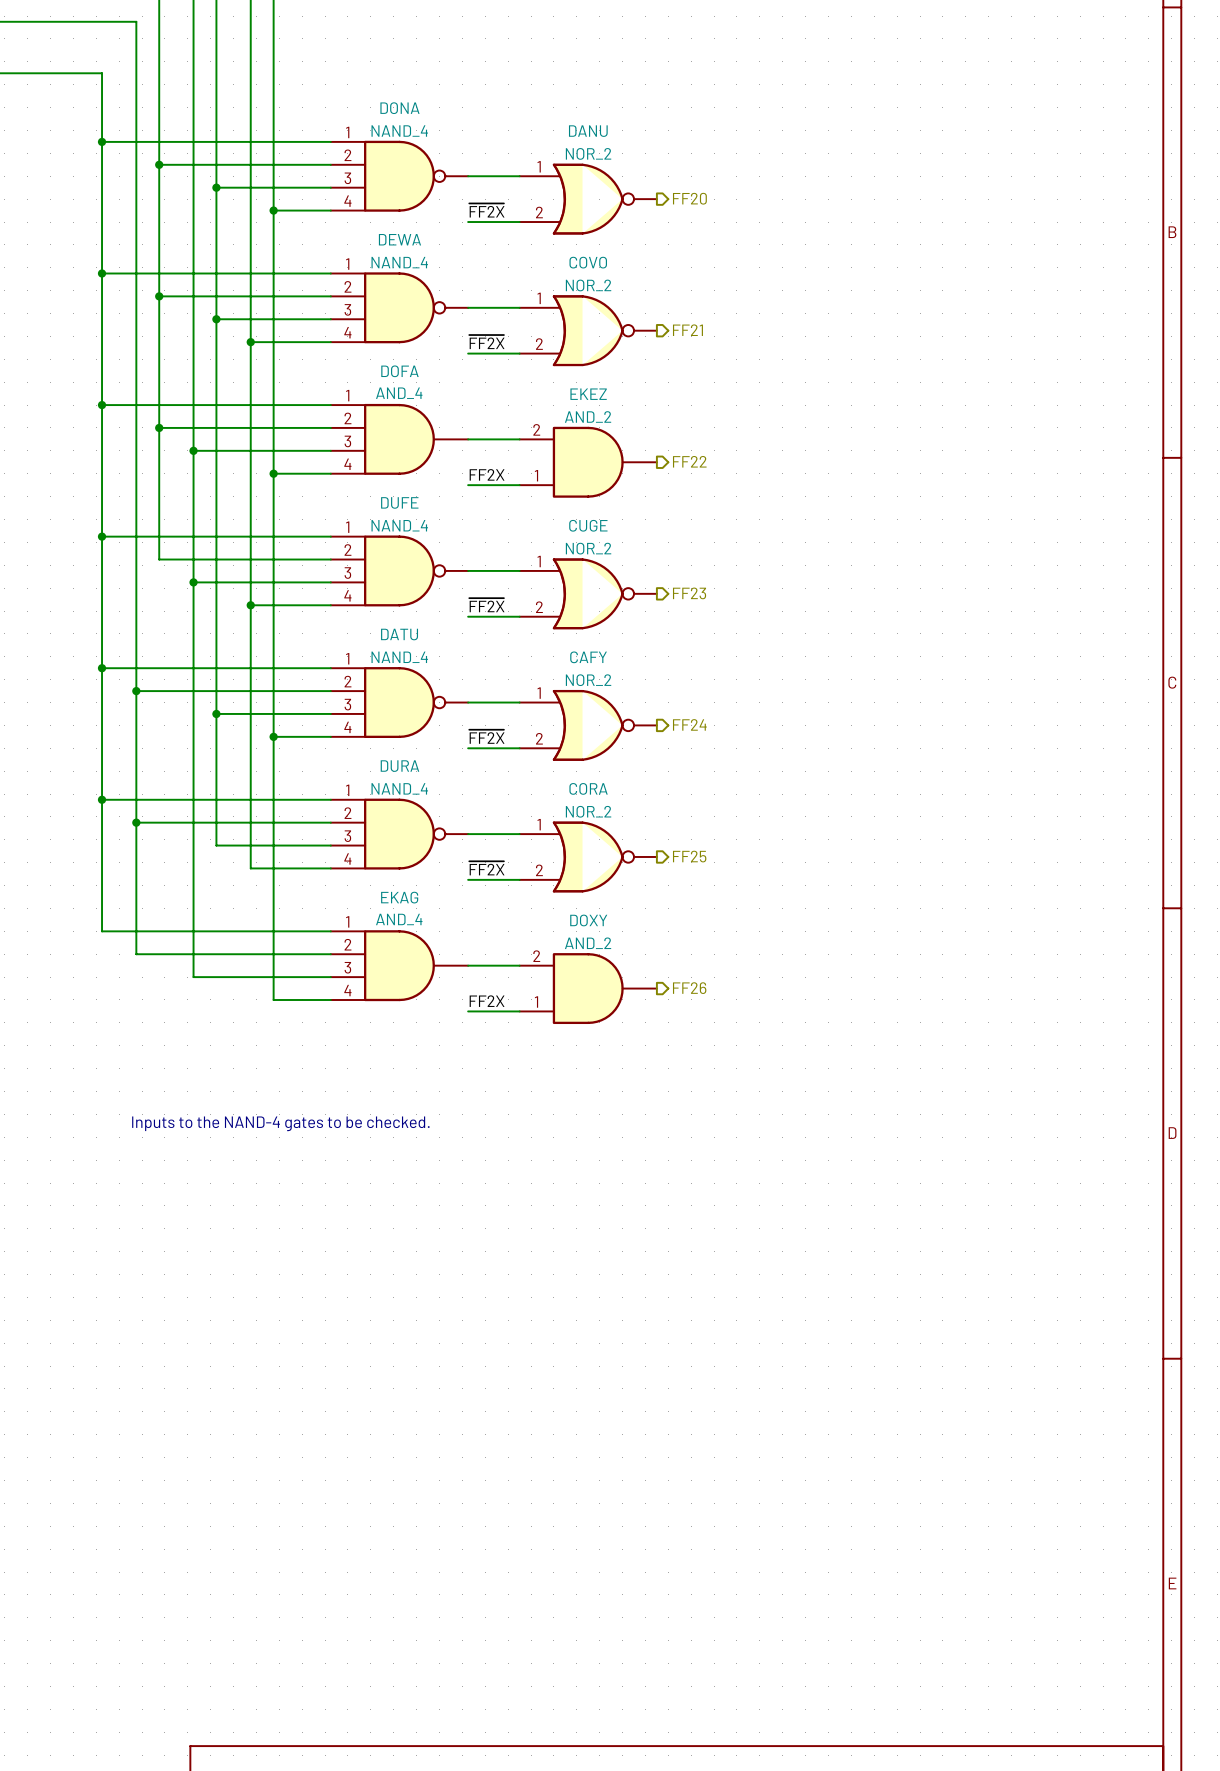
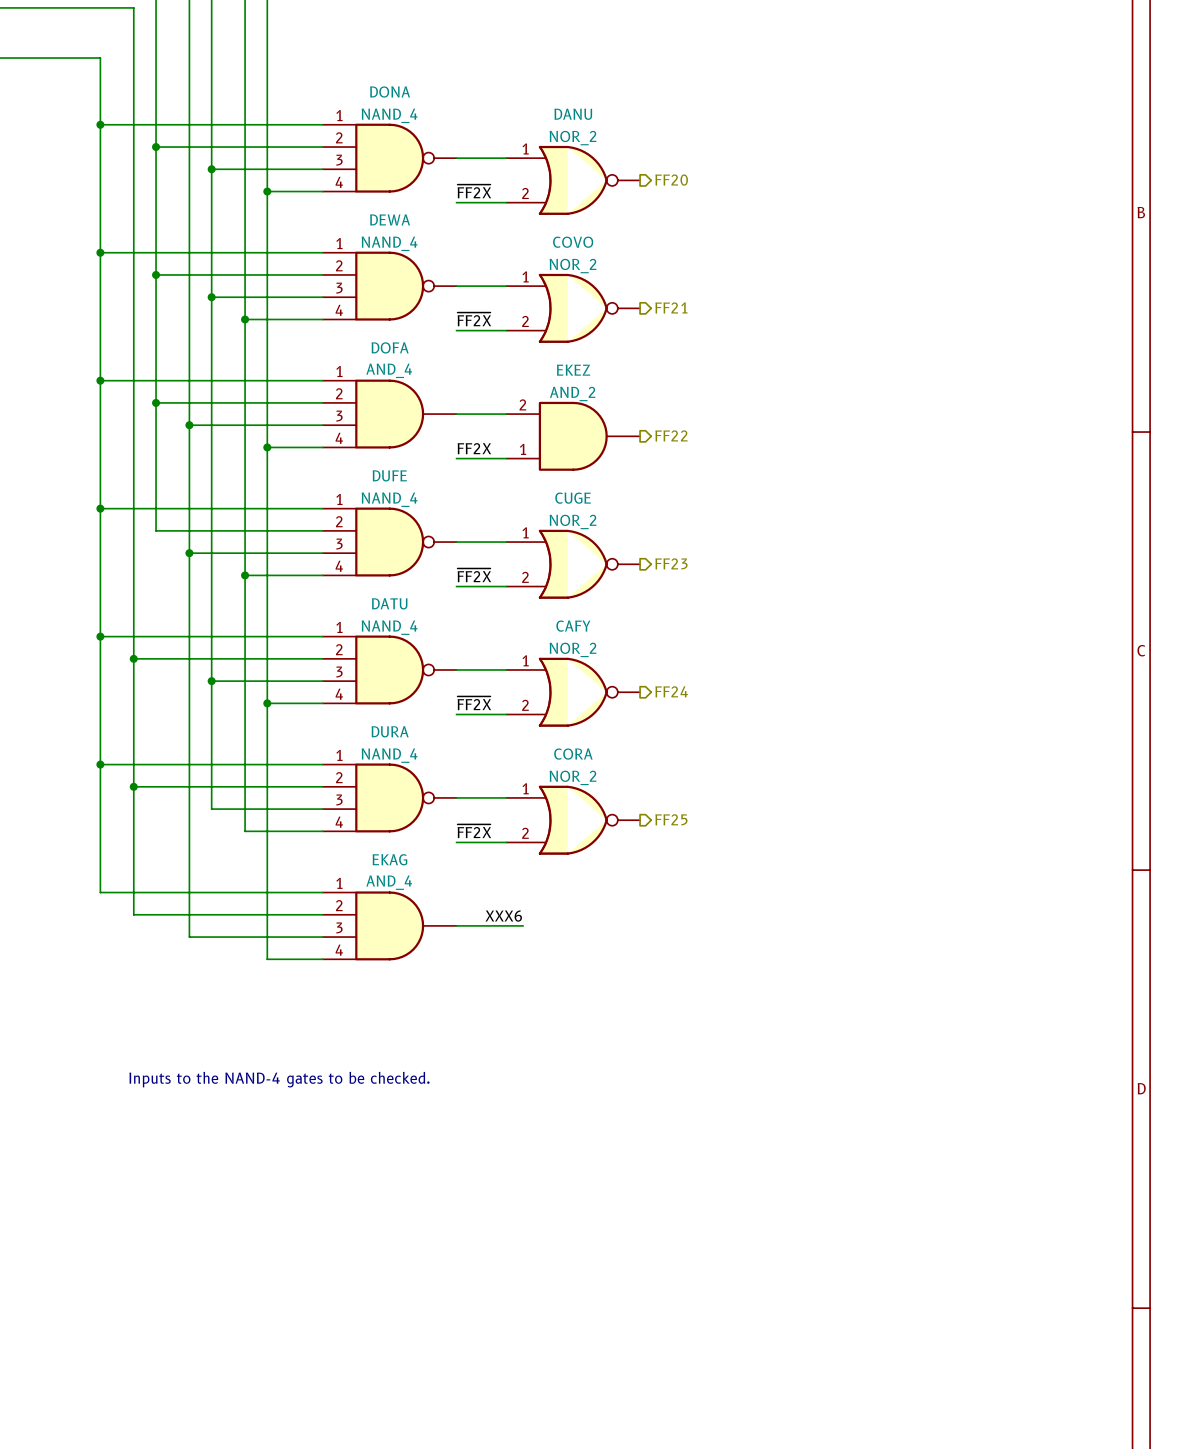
label: none -> XXX6 (503, 916)
DOXY: AND_2 (588, 988) -> none
hierarchical label: FF26 (689, 988) -> none
label: FF2X (487, 1001) -> none
wire: (468, 1011) (519, 1011) -> none

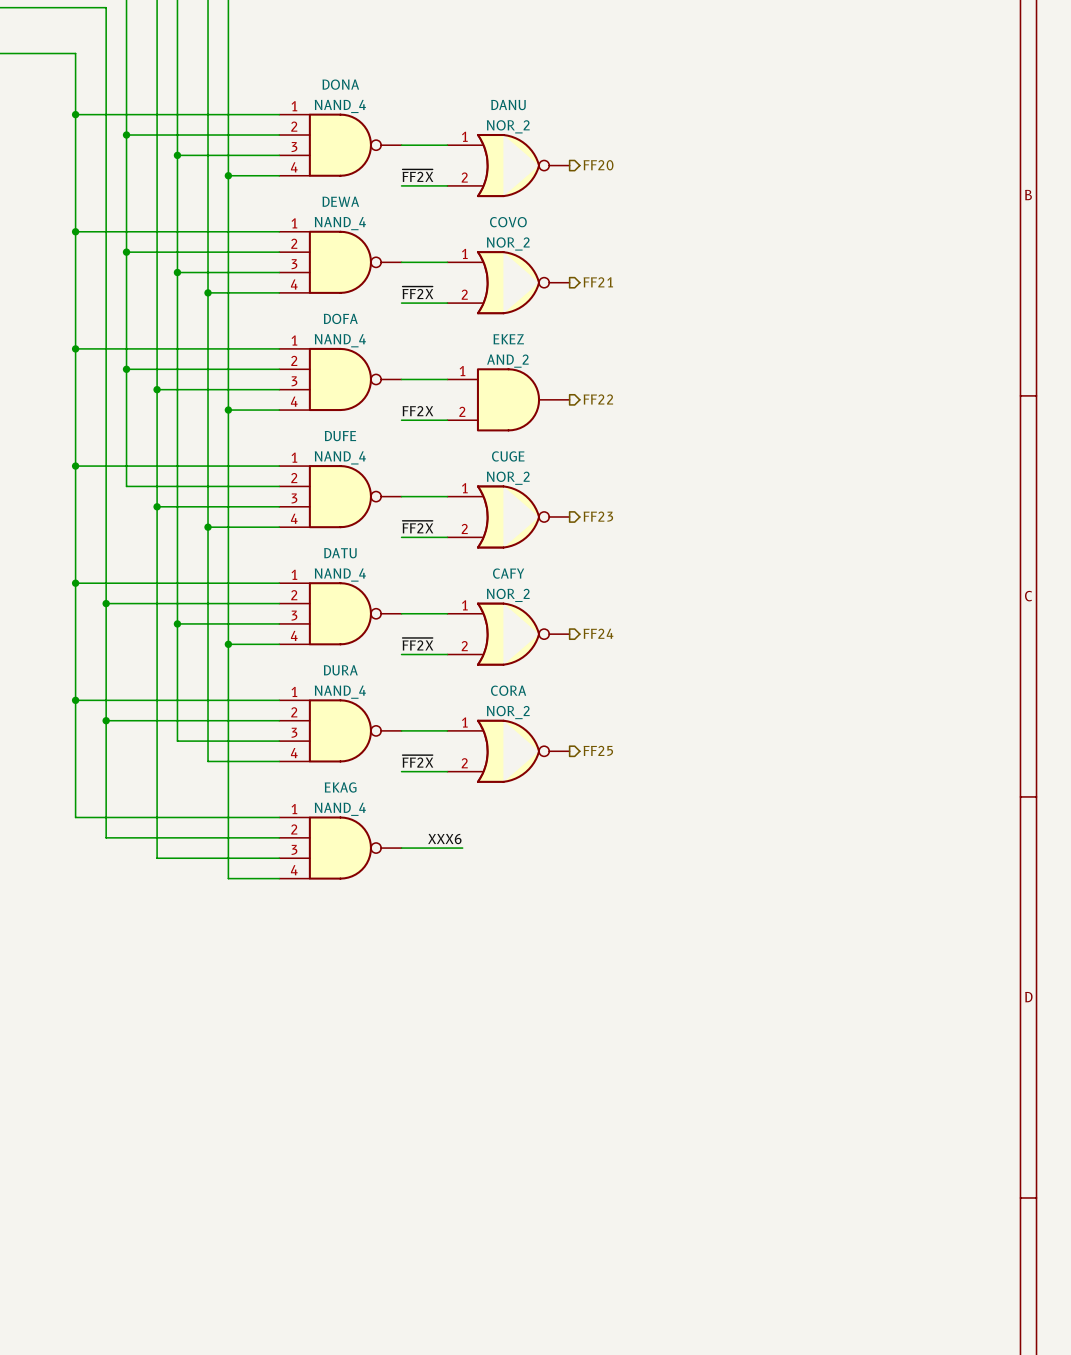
DOFA value: AND_4 (389, 370) -> NAND_4 (340, 340)
DOFA symbol: [322, 379, 457, 449] -> [279, 347, 402, 412]
EKEZ flip: as is (573, 436) -> up-down (508, 399)
EKAG value: AND_4 (389, 882) -> NAND_4 (340, 809)
EKAG symbol: [322, 891, 457, 961] -> [279, 816, 402, 880]
text: Inputs to the NAND-4 gates to be checked. (279, 1079) -> none

